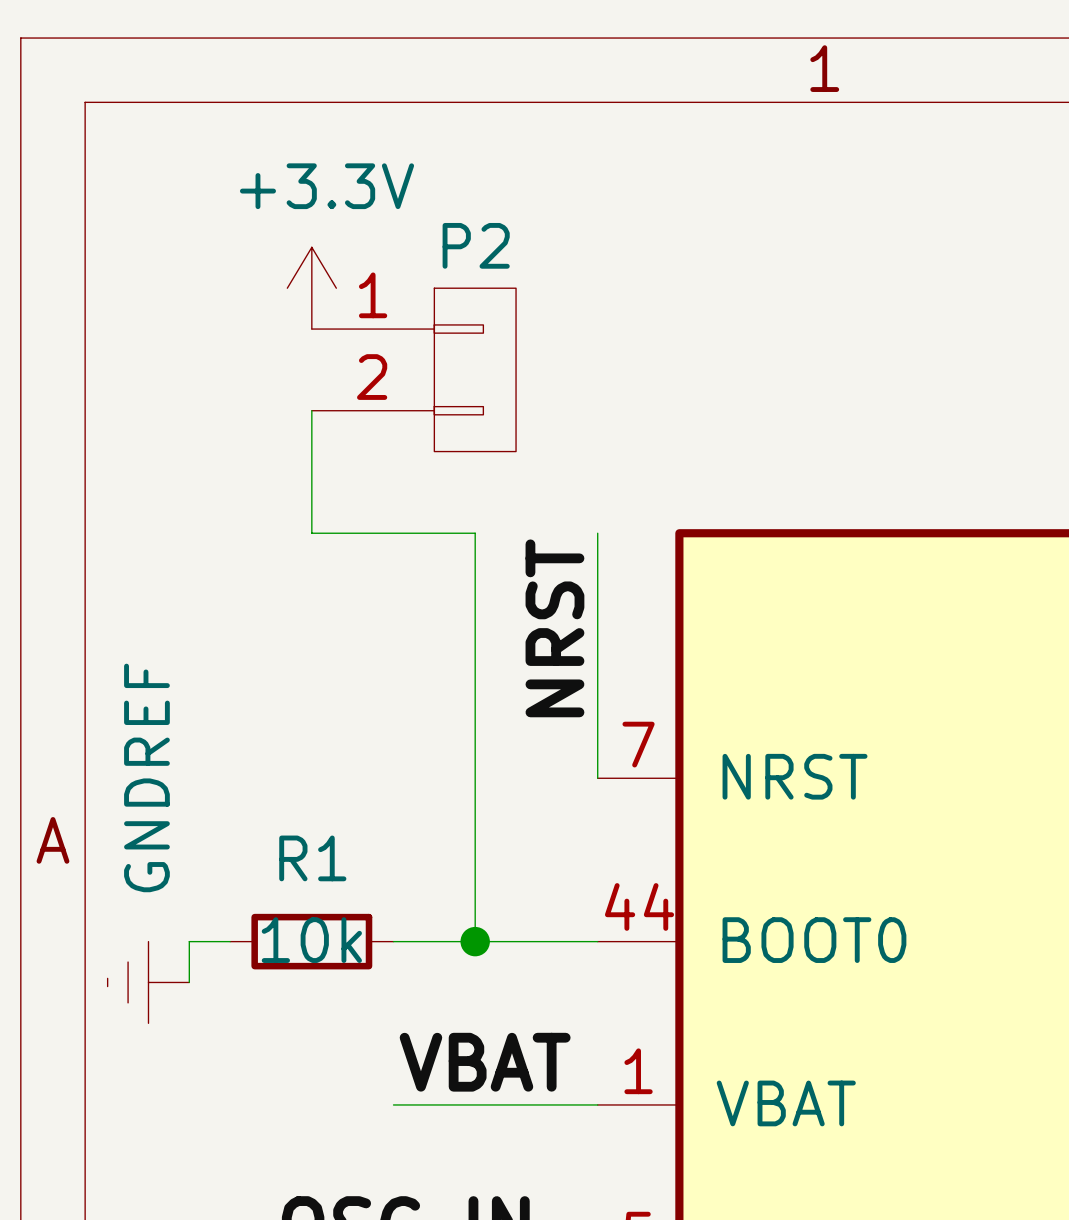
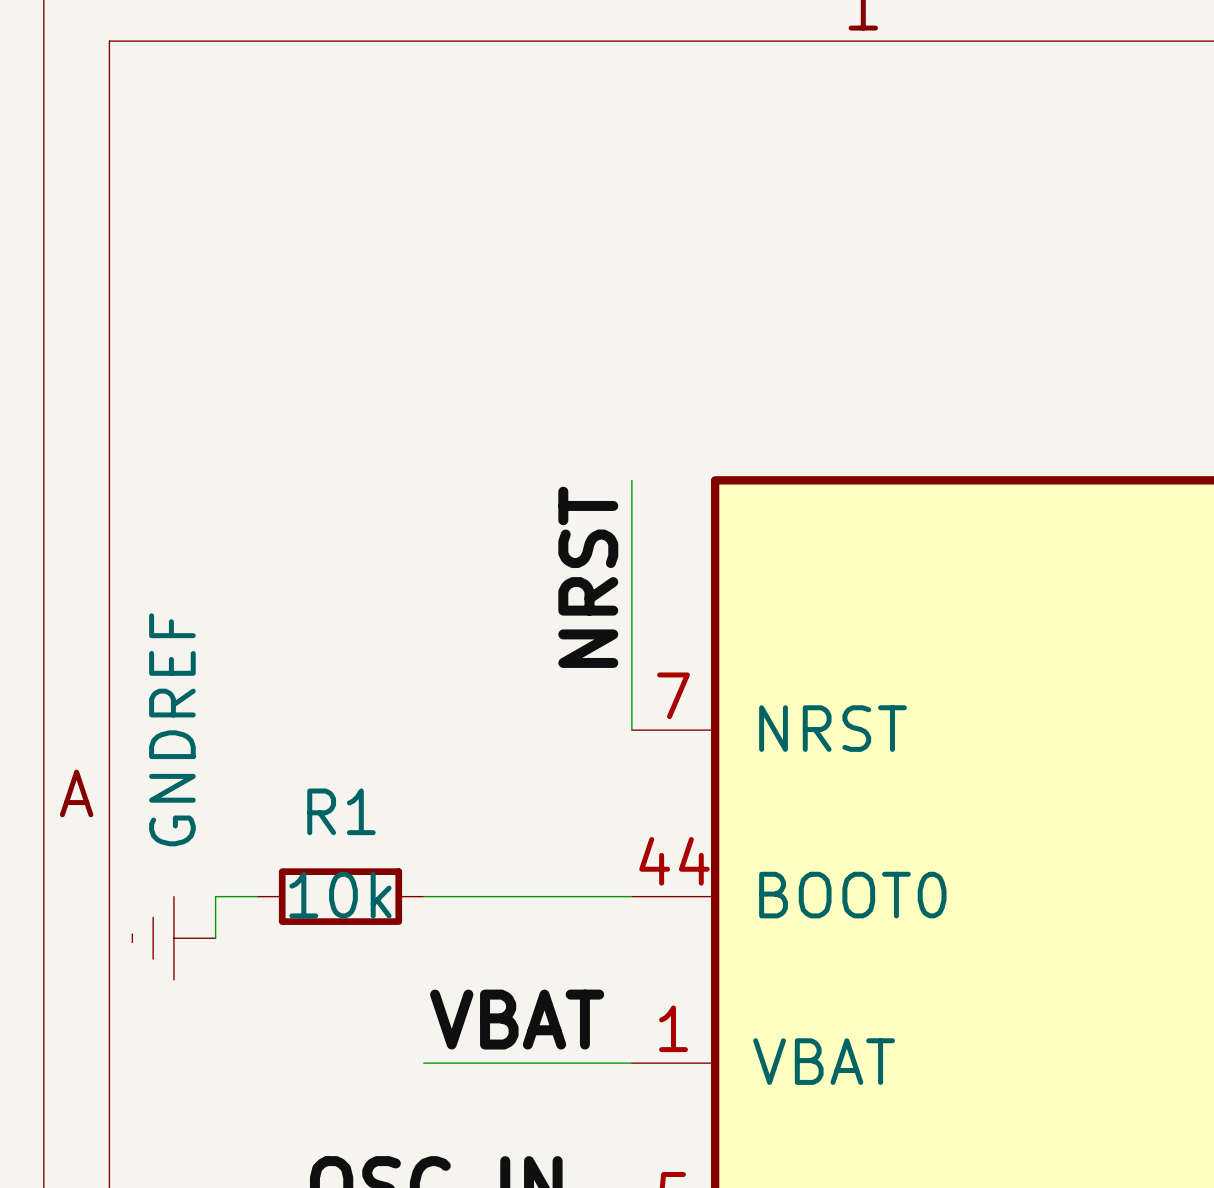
power symbol: +3.3V (311, 288) -> none
P2: (413, 369) -> none
wire: (311, 410) (311, 533) (475, 533) (475, 941) -> none
junction: (475, 941) -> none

